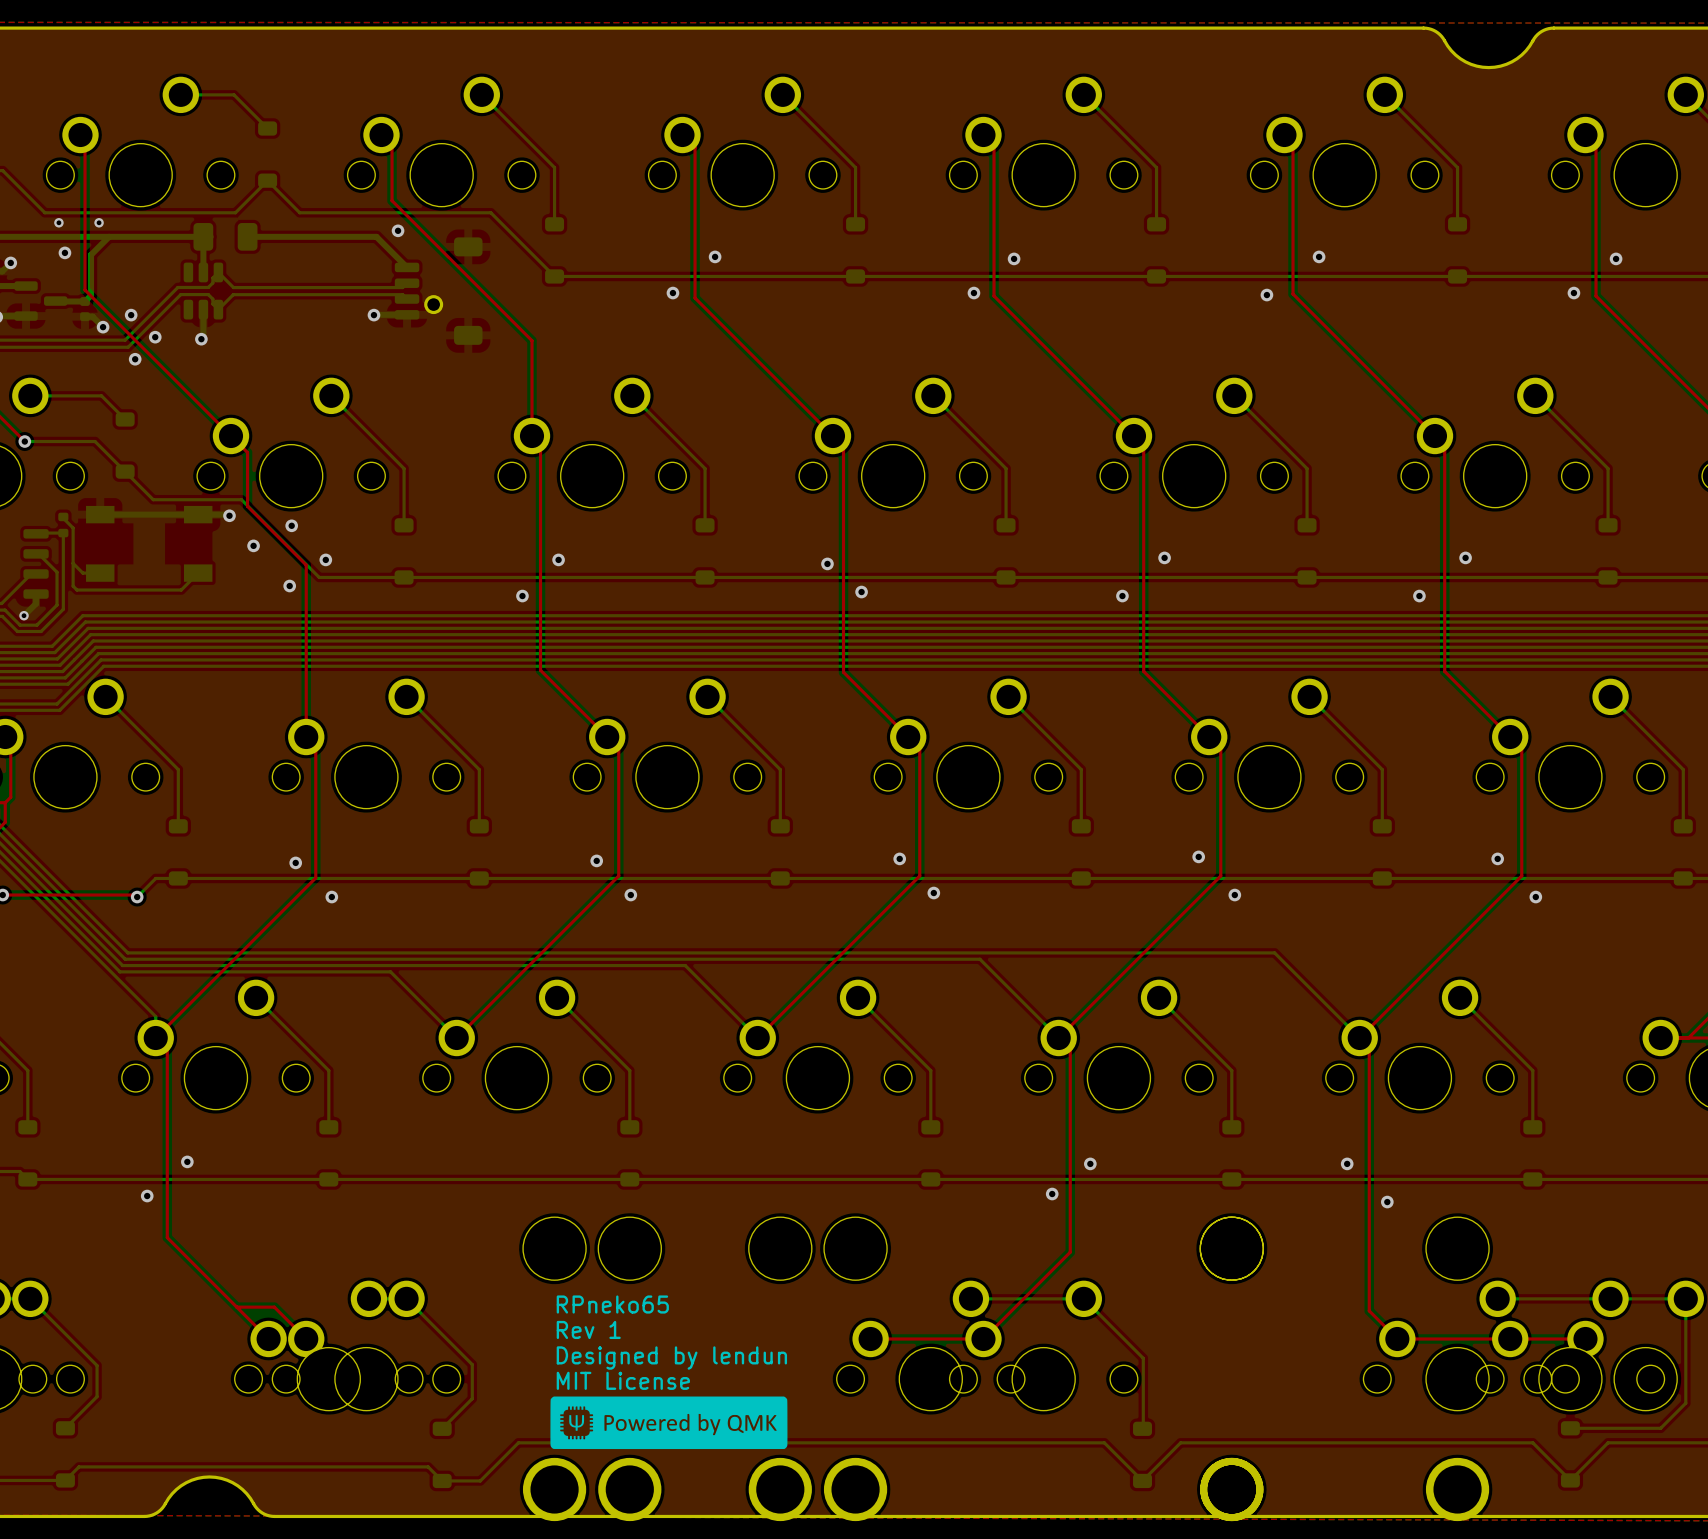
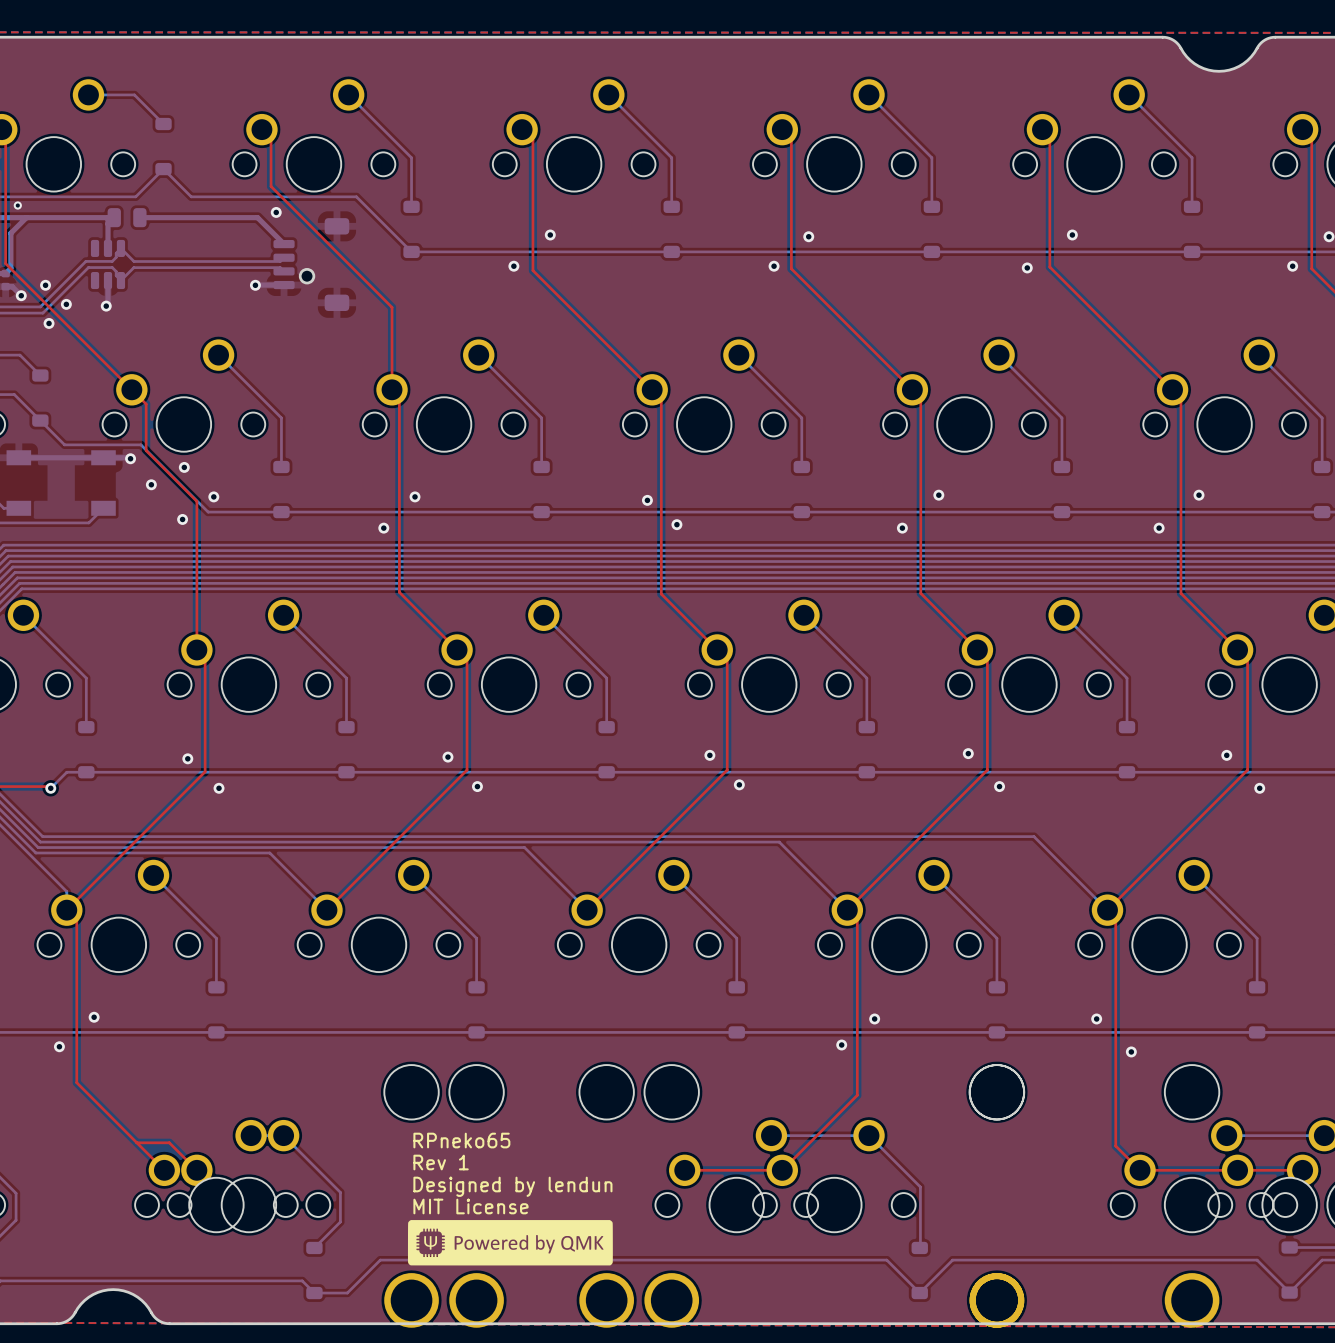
part footprint: [193, 223, 258, 251] -> [107, 208, 147, 228]

